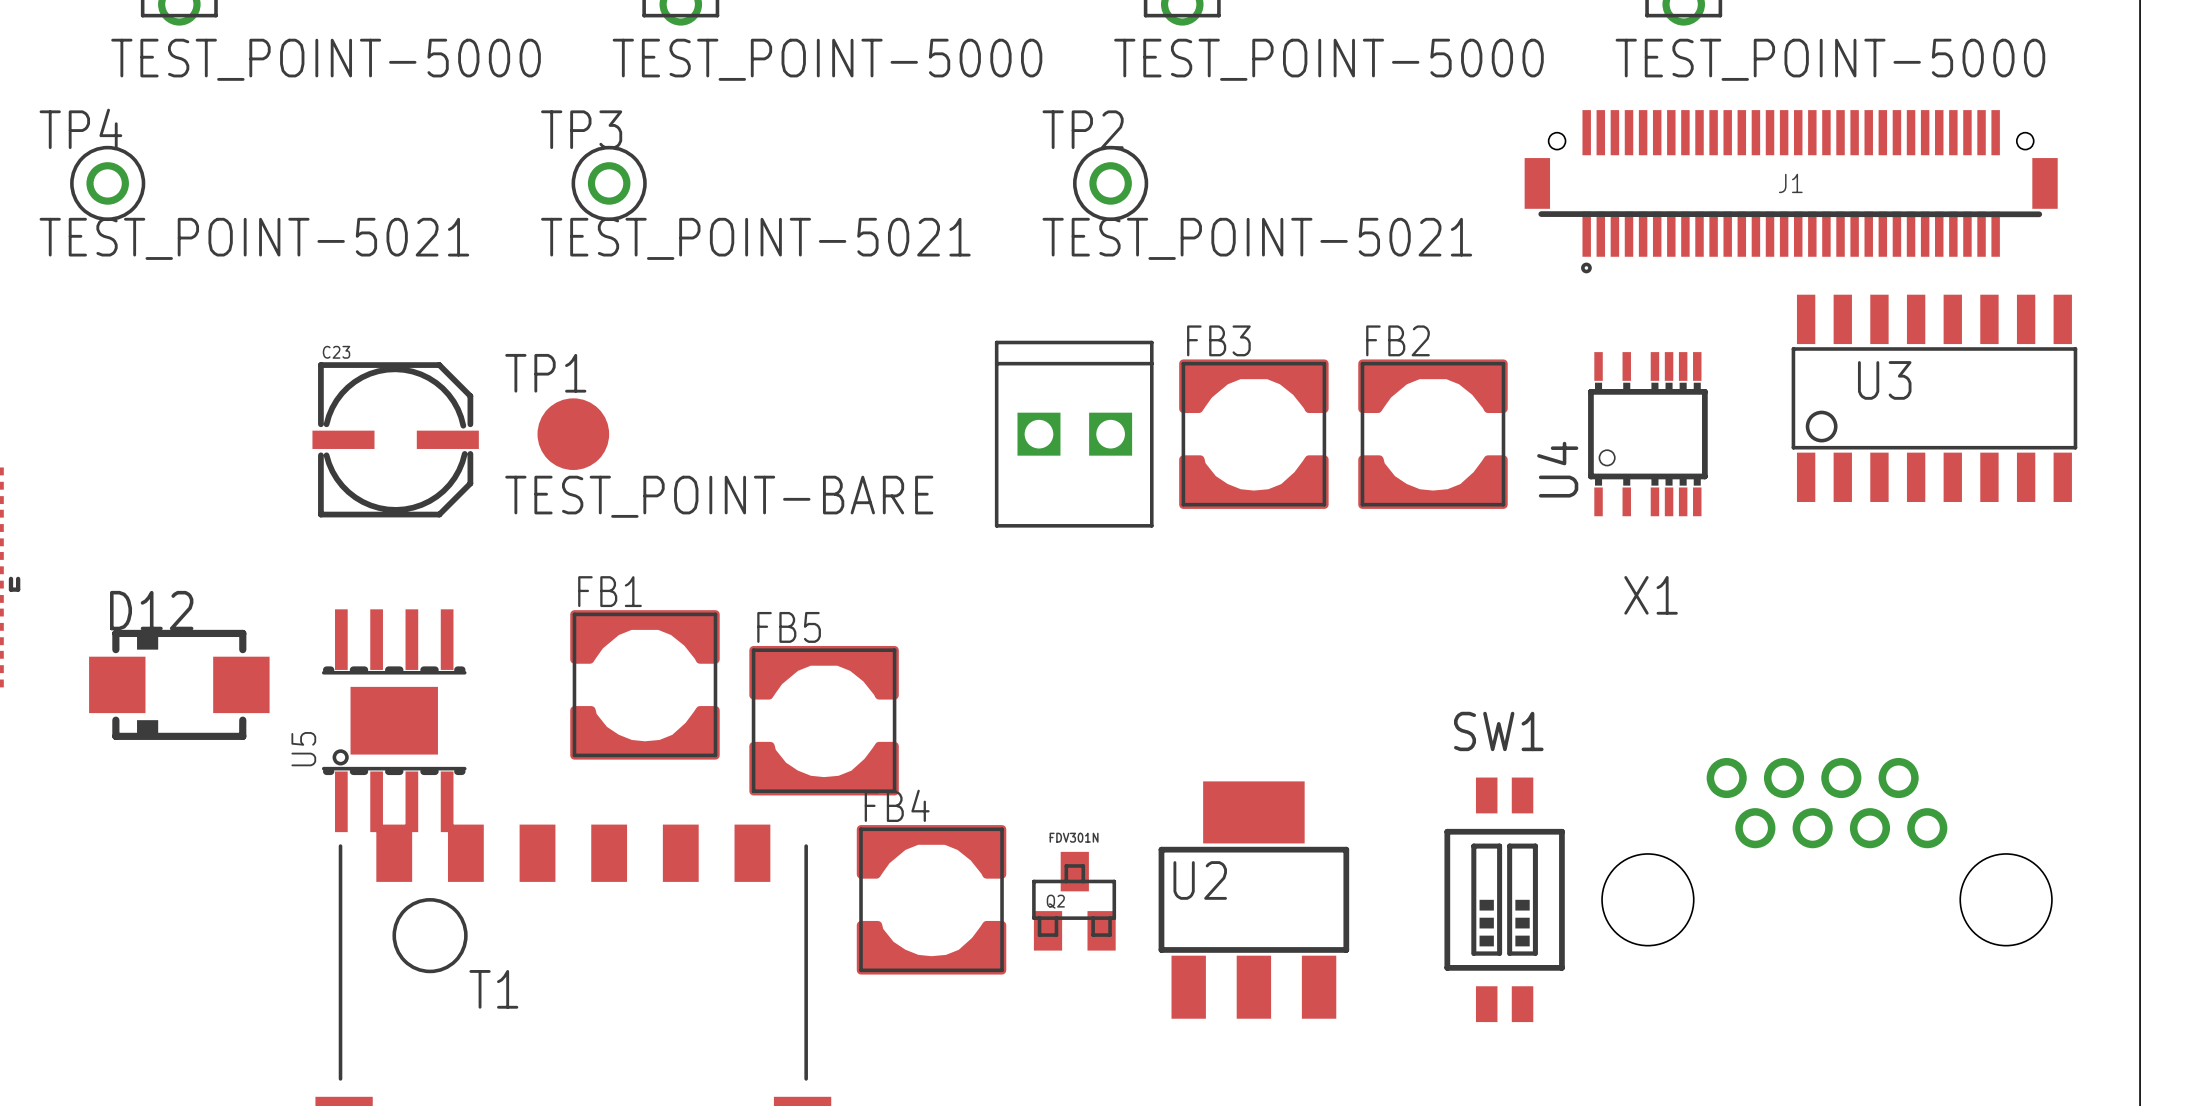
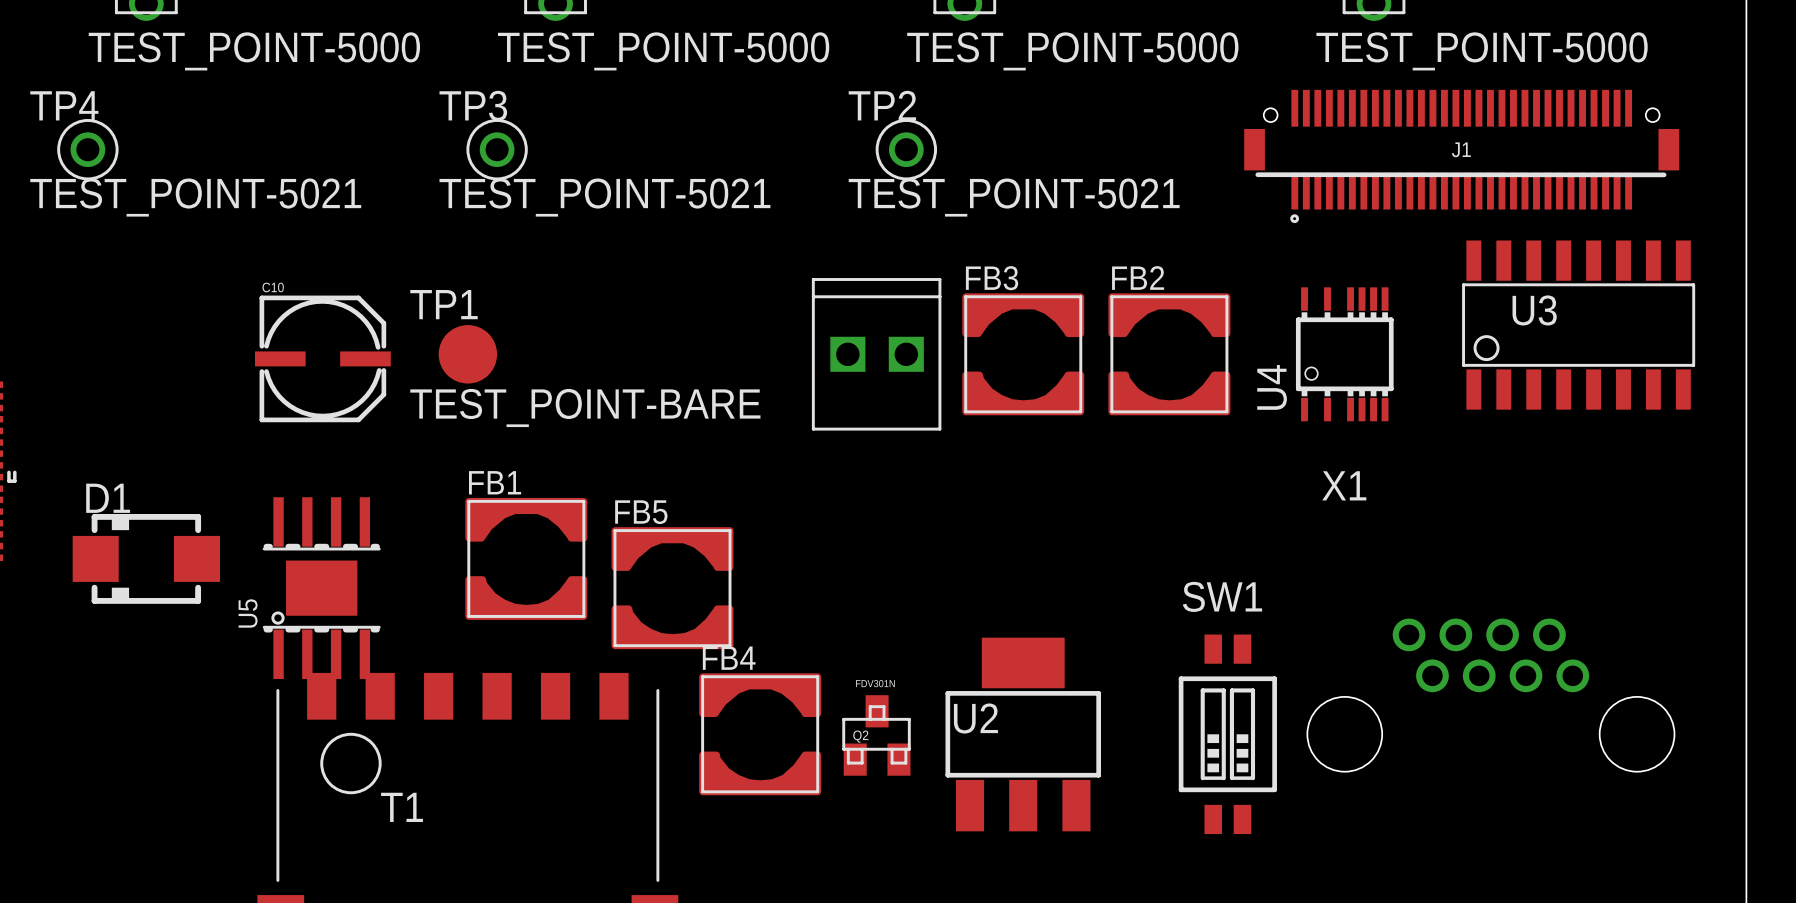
C23 name: C23 (336, 352) -> C10 (273, 287)
D12 name: D12 (151, 610) -> D1 (108, 498)

